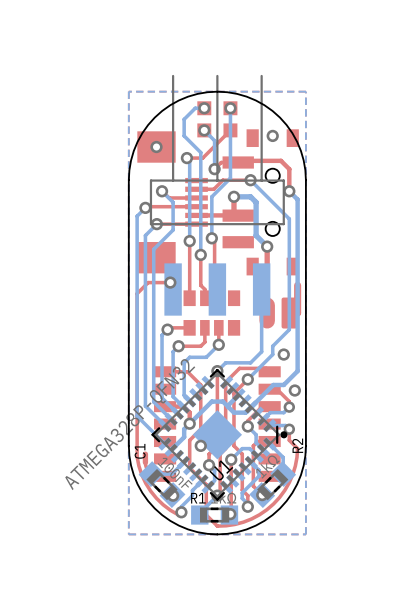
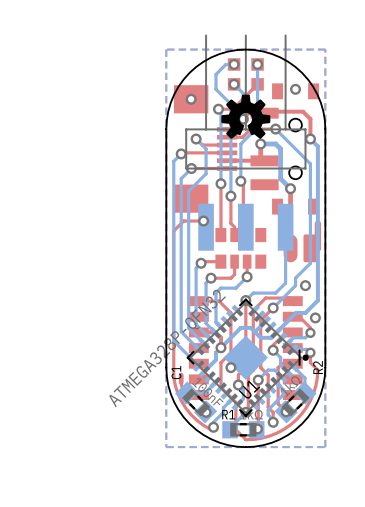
drawing: none -> [221, 94, 271, 139]

